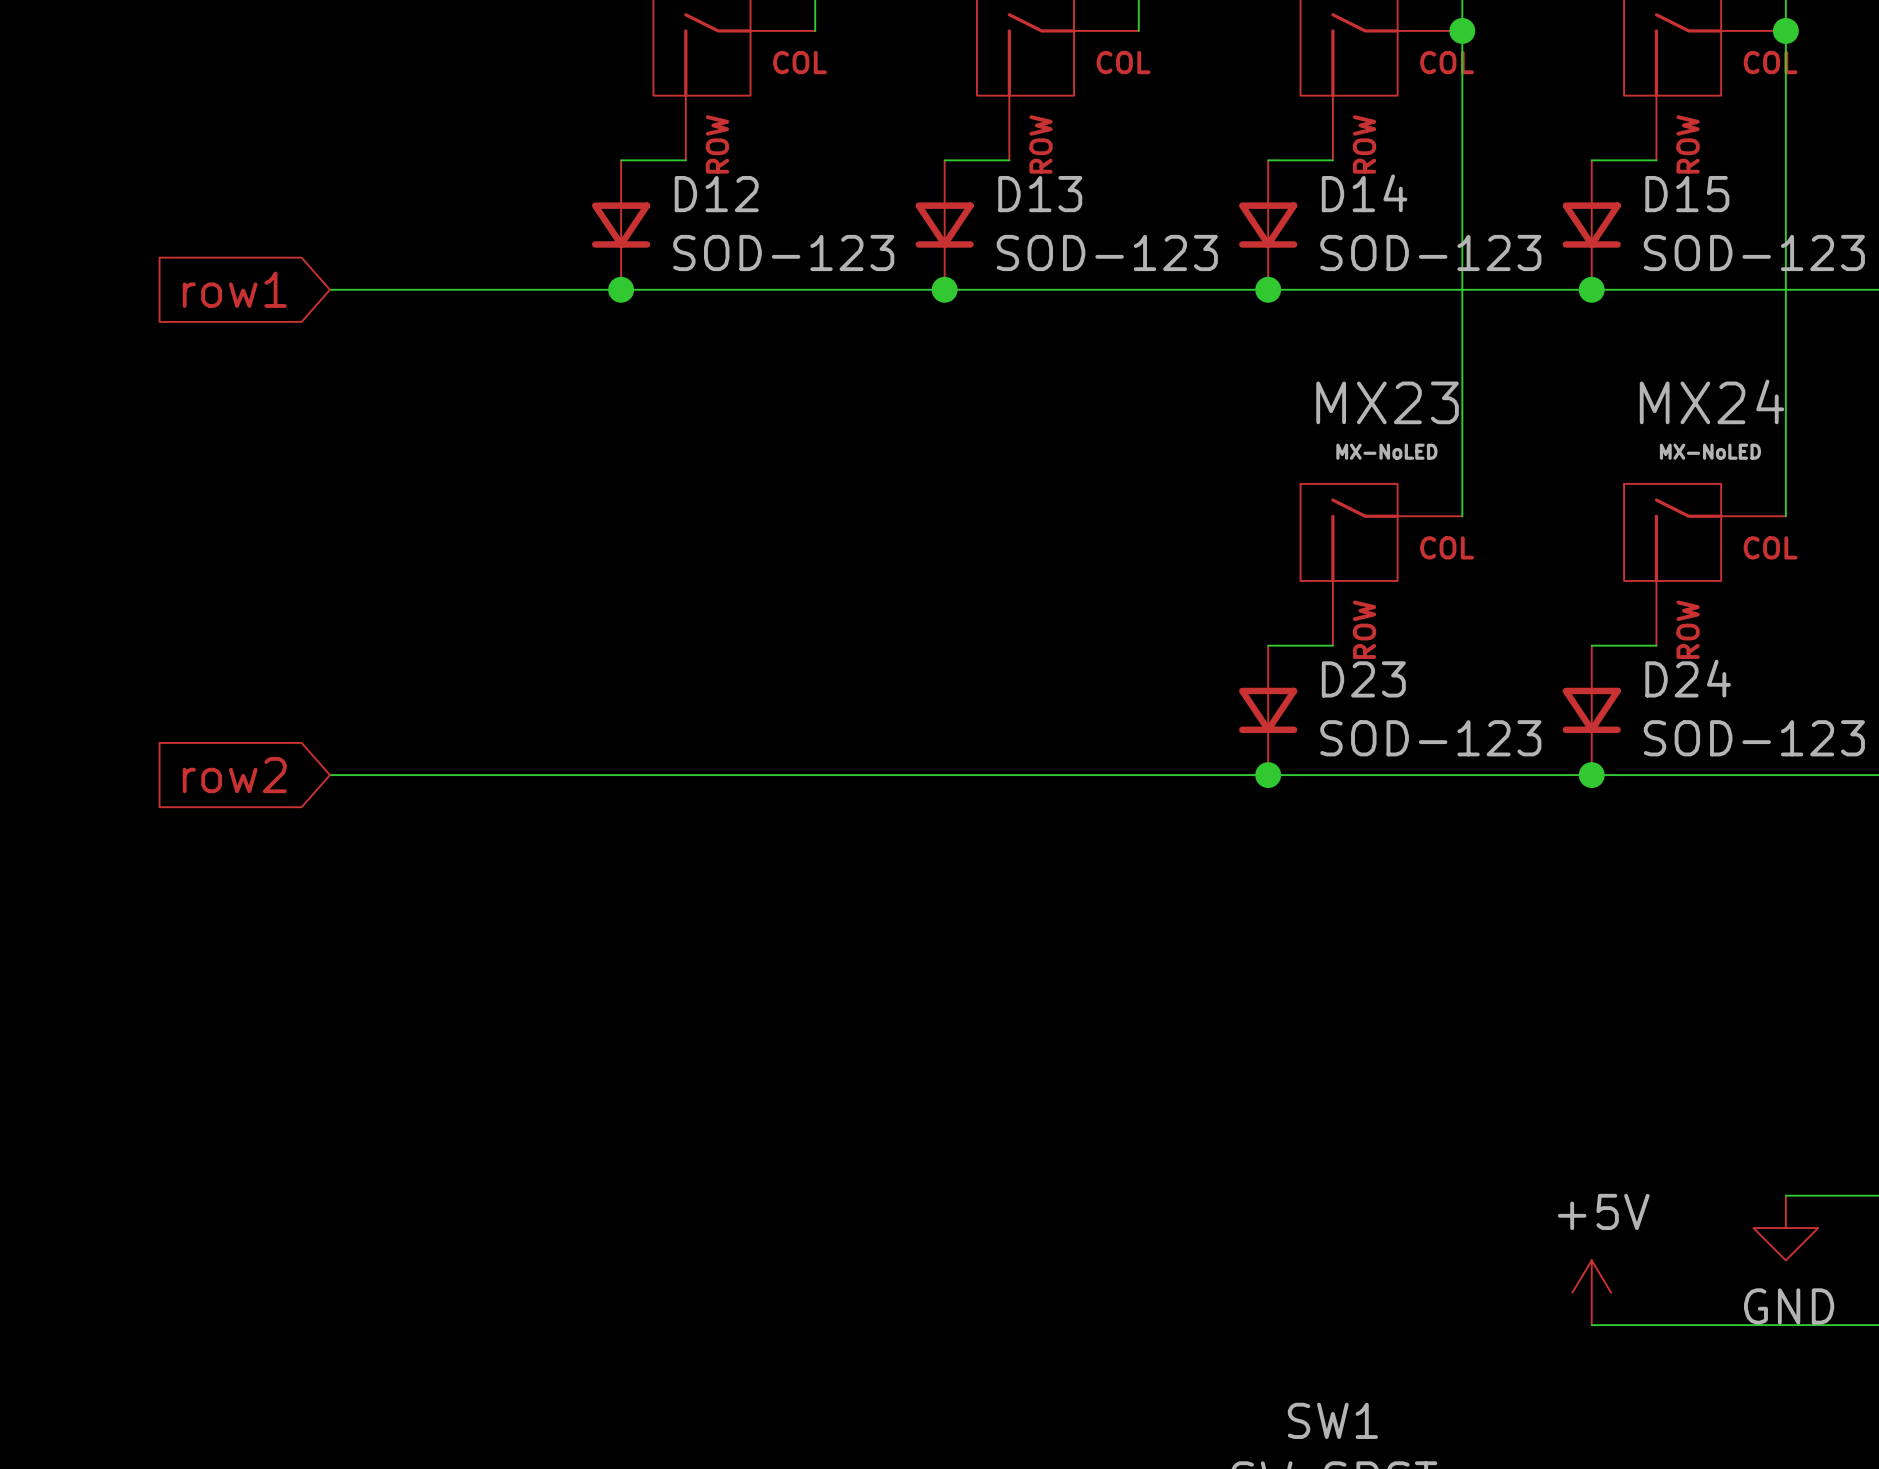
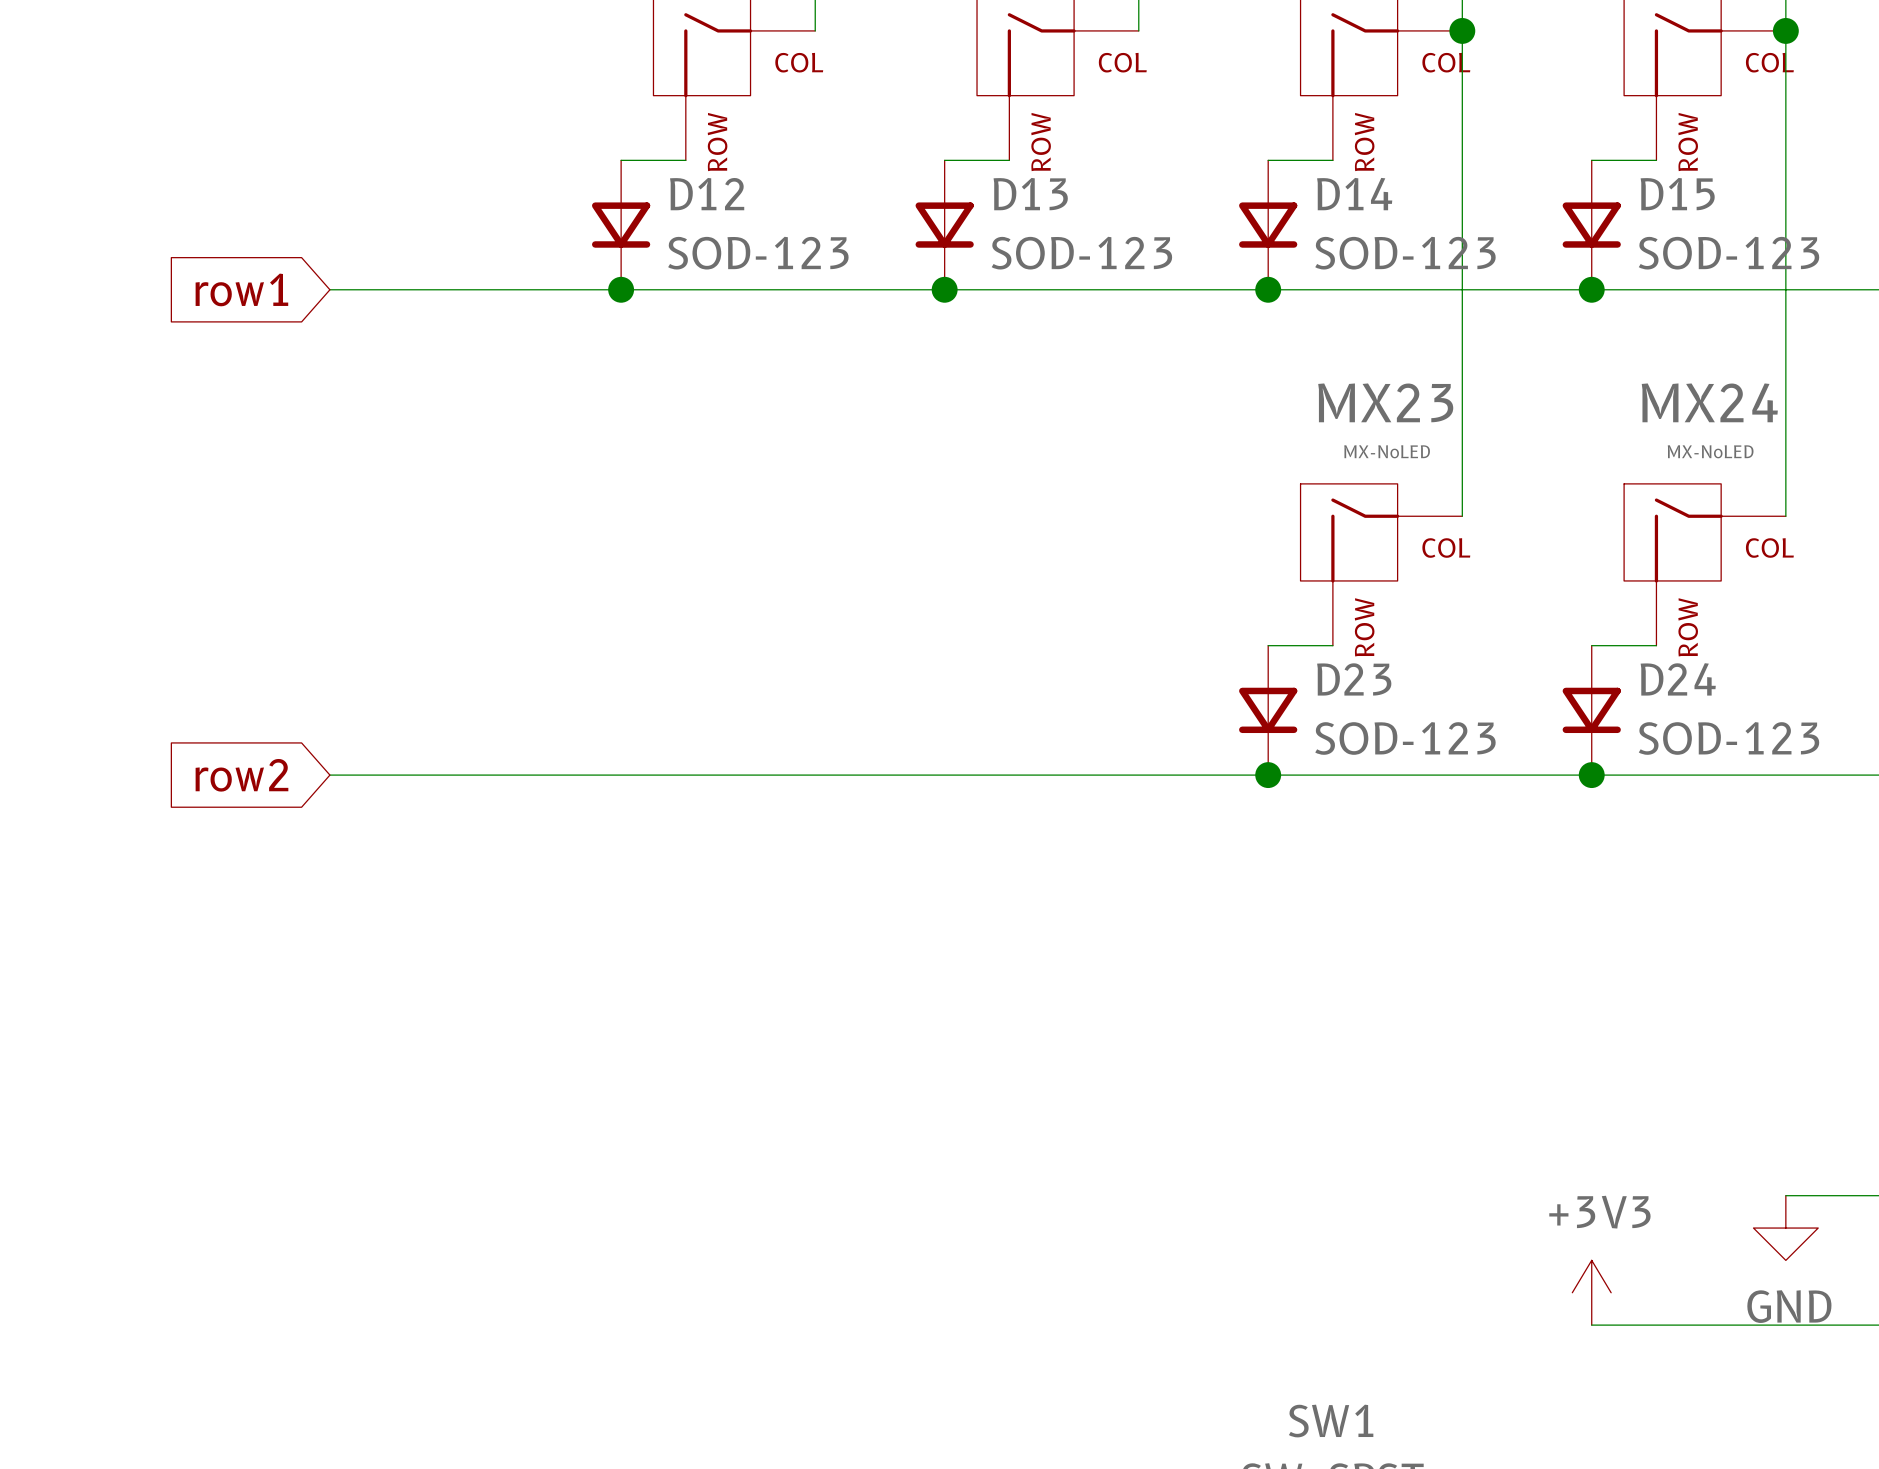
power symbol: +5V (1591, 1292) -> +3V3 (1591, 1292)

